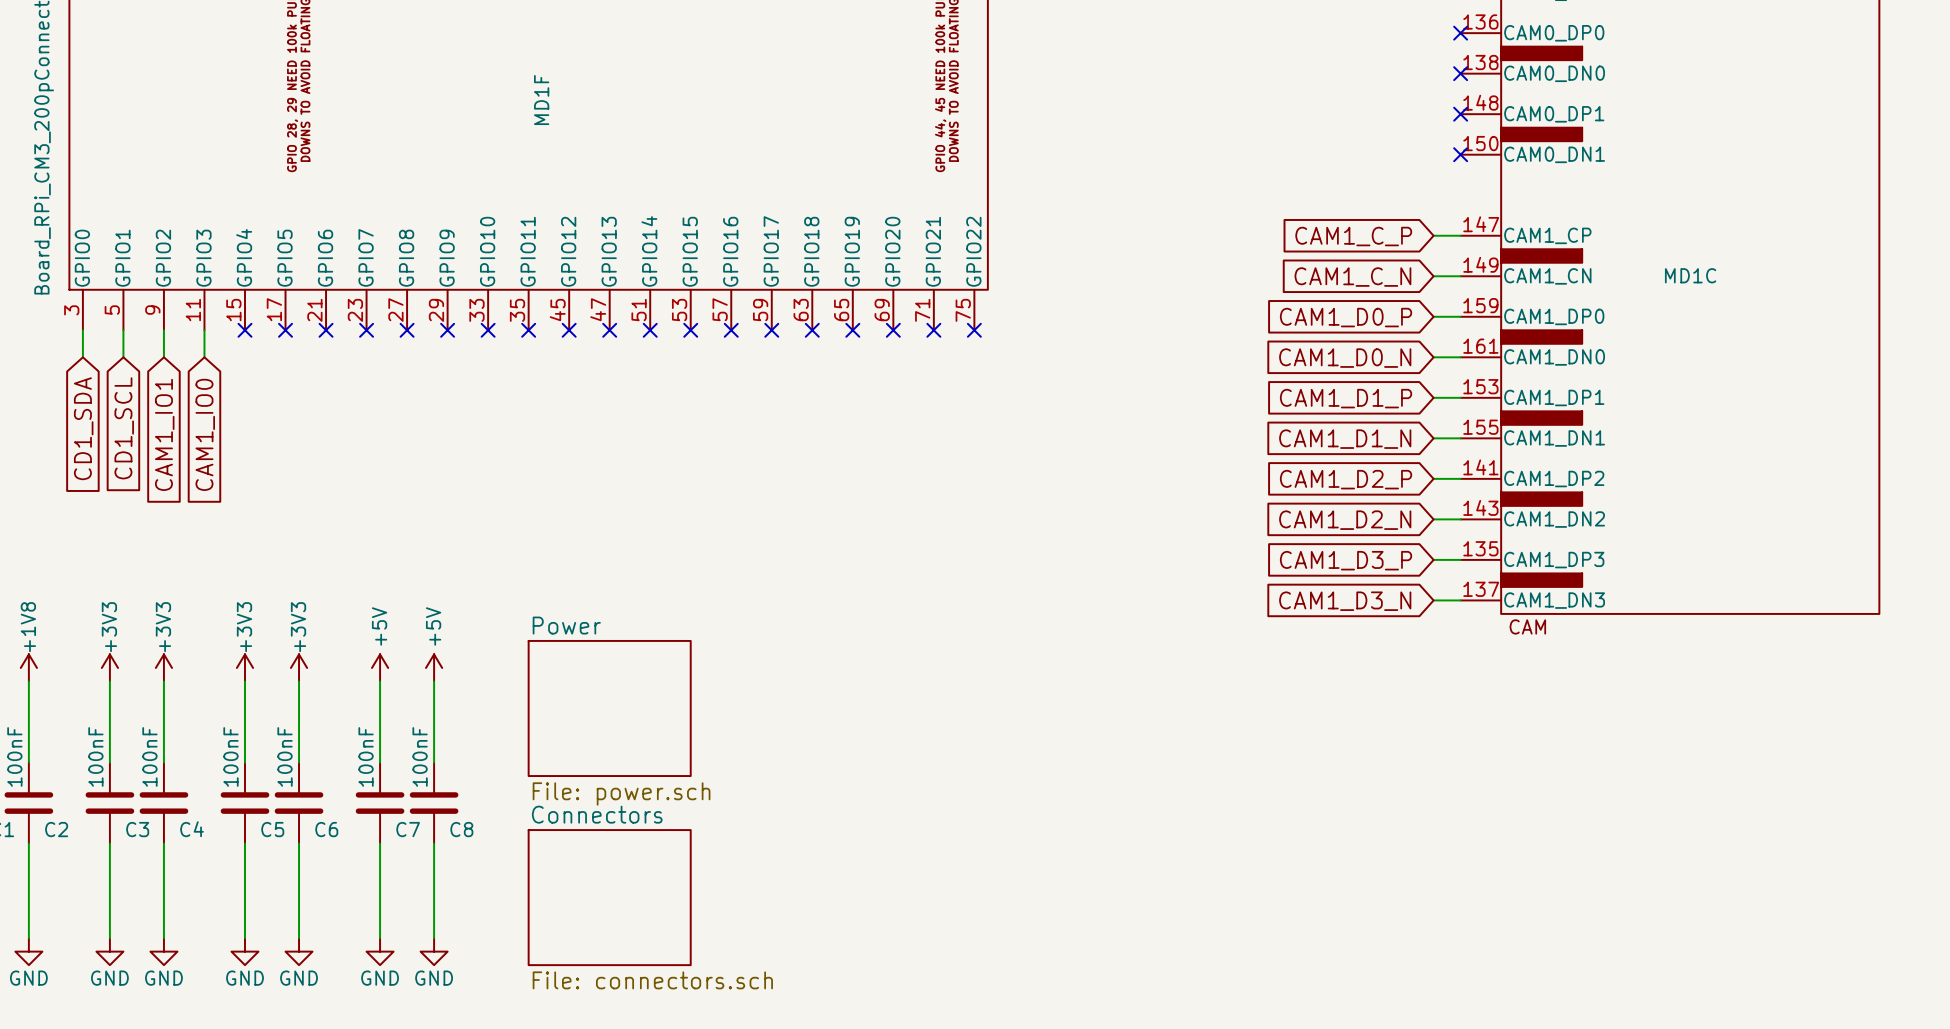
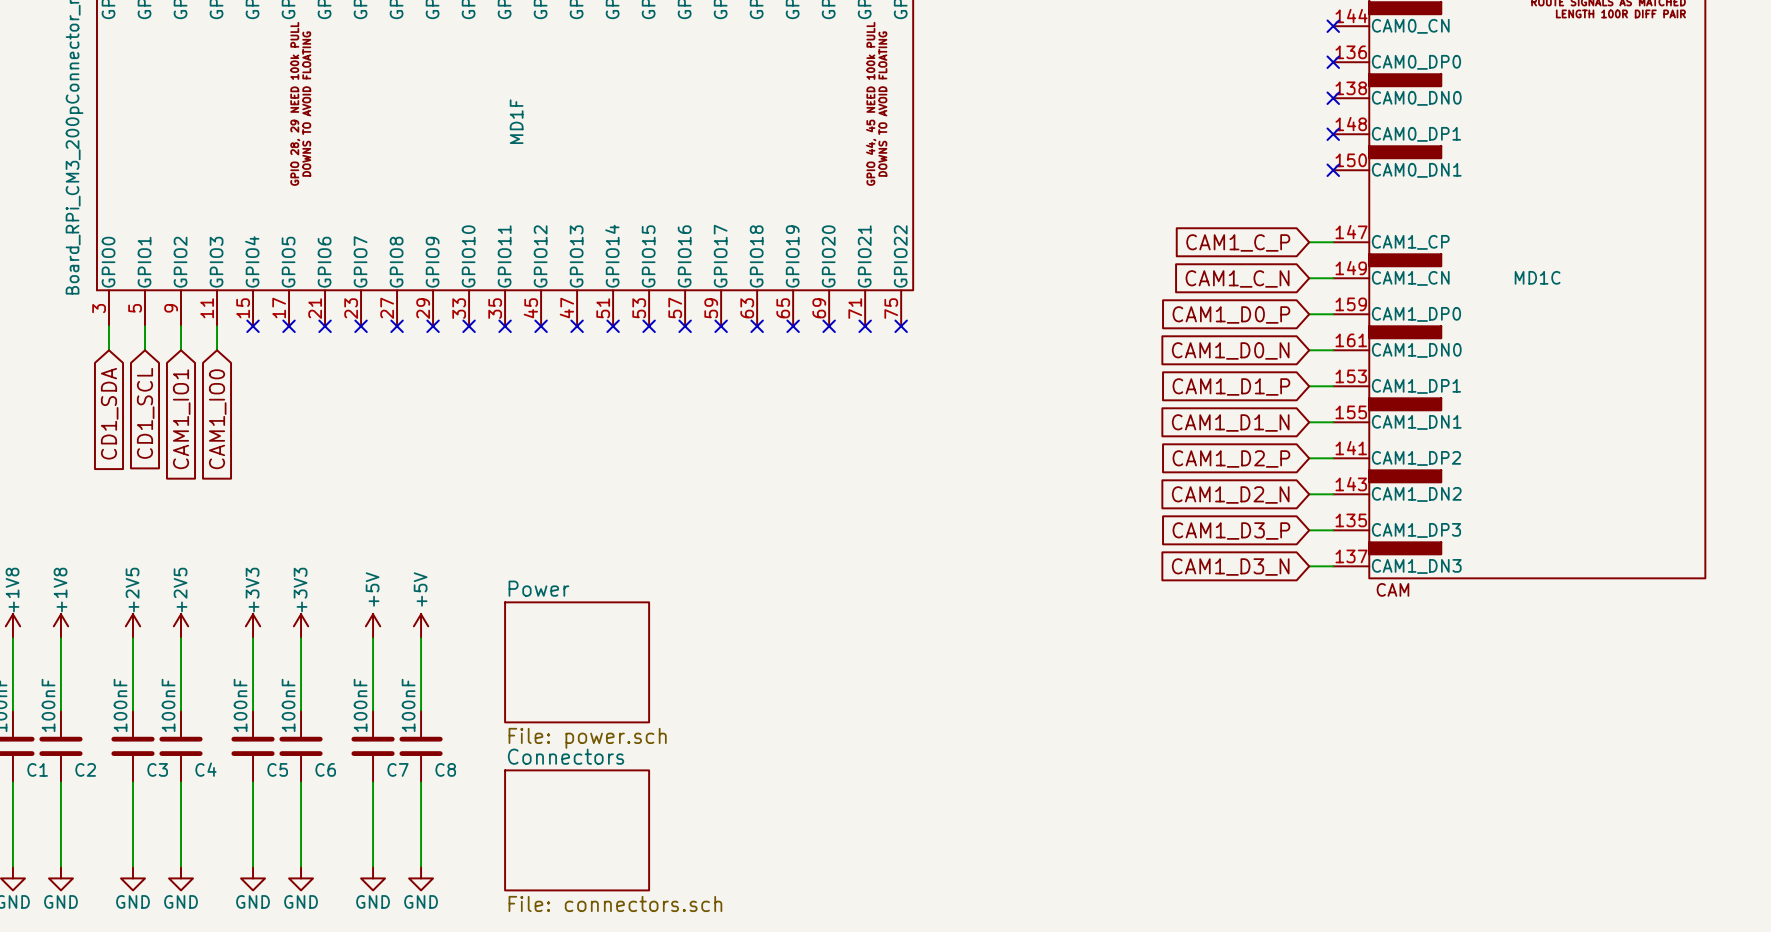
power symbol: +3V3 (109, 667) -> +2V5 (132, 626)
power symbol: +3V3 (163, 667) -> +2V5 (181, 626)

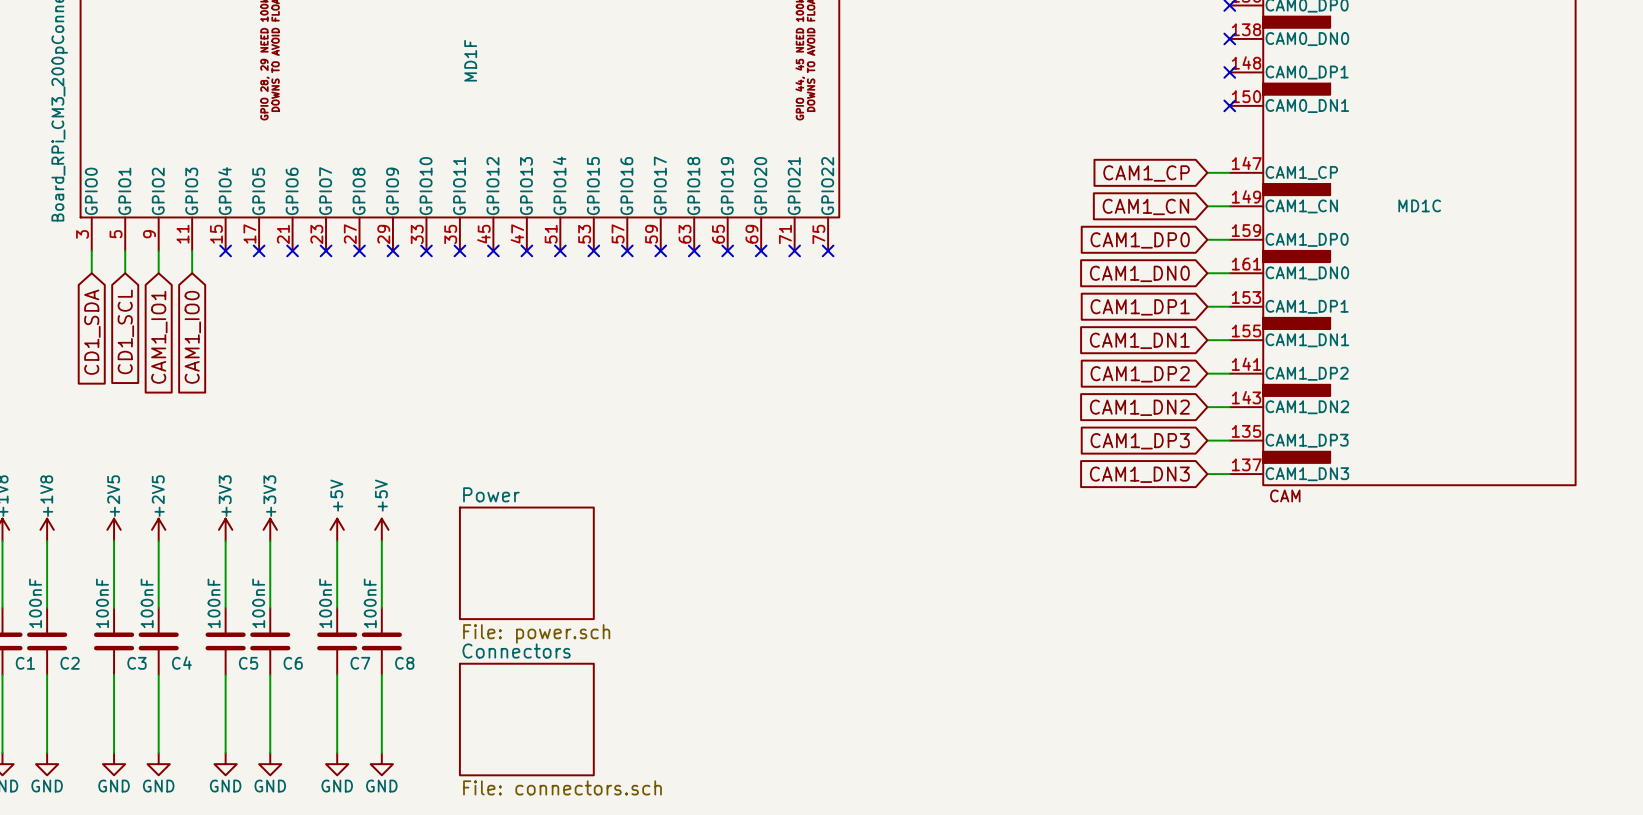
global label: CAM1_C_P (1238, 242) -> CAM1_CP (1146, 173)
global label: CAM1_C_N (1237, 278) -> CAM1_CN (1145, 206)
global label: CAM1_D0_P (1231, 314) -> CAM1_DP0 (1140, 240)
global label: CAM1_D0_N (1230, 350) -> CAM1_DN0 (1139, 273)
global label: CAM1_D1_P (1231, 386) -> CAM1_DP1 (1140, 307)
global label: CAM1_D1_N (1230, 422) -> CAM1_DN1 (1139, 340)
global label: CAM1_D2_P (1231, 459) -> CAM1_DP2 (1140, 374)
global label: CAM1_D2_N (1230, 495) -> CAM1_DN2 (1139, 407)
global label: CAM1_D3_P (1231, 531) -> CAM1_DP3 (1140, 441)
global label: CAM1_D3_N (1230, 567) -> CAM1_DN3 (1139, 474)

